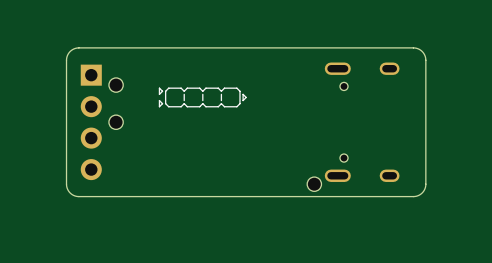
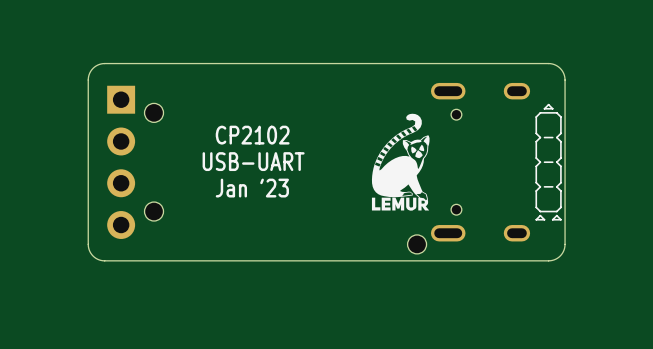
drawing: none -> [535, 103, 562, 221]
drawing: none -> [371, 113, 430, 211]
drawing: [158, 87, 247, 108] -> none
text: none -> CP2102 (252, 135)
text: none -> USB-UART (253, 161)
part position: (116, 122) -> (154, 211)
text: none -> Jan '23 (252, 188)

